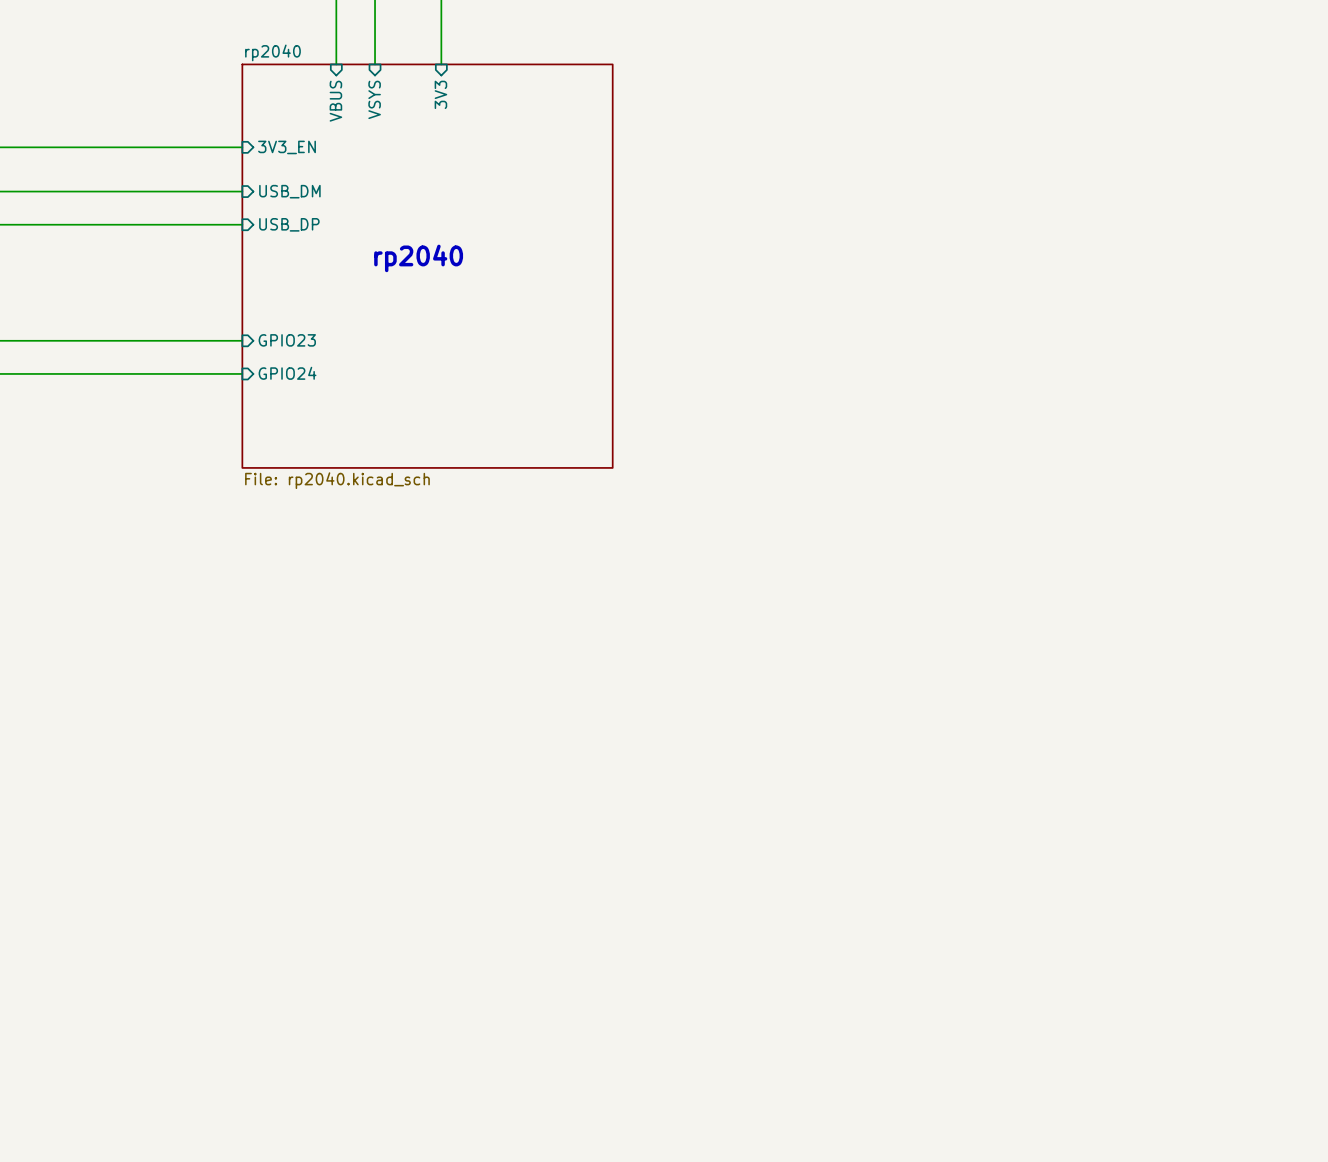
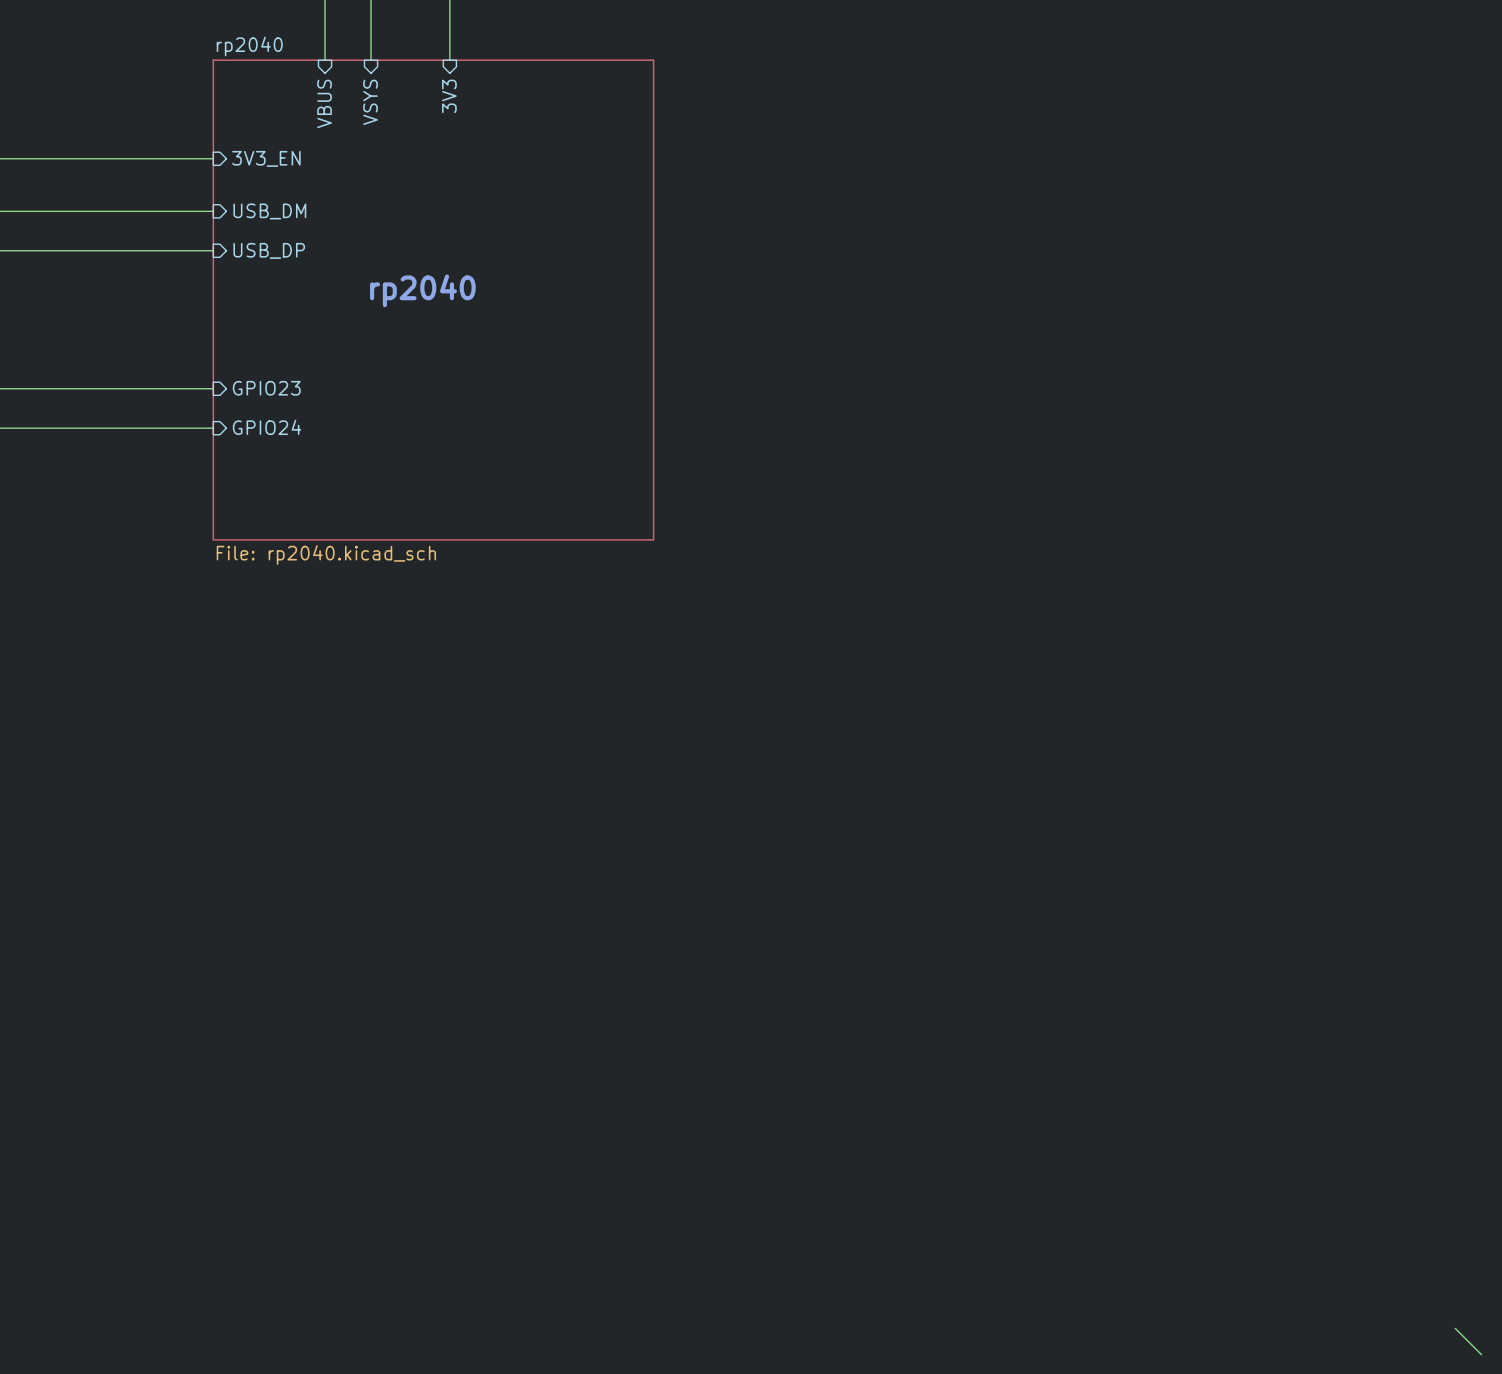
wire: none -> (1455, 1328) (1481, 1354)

